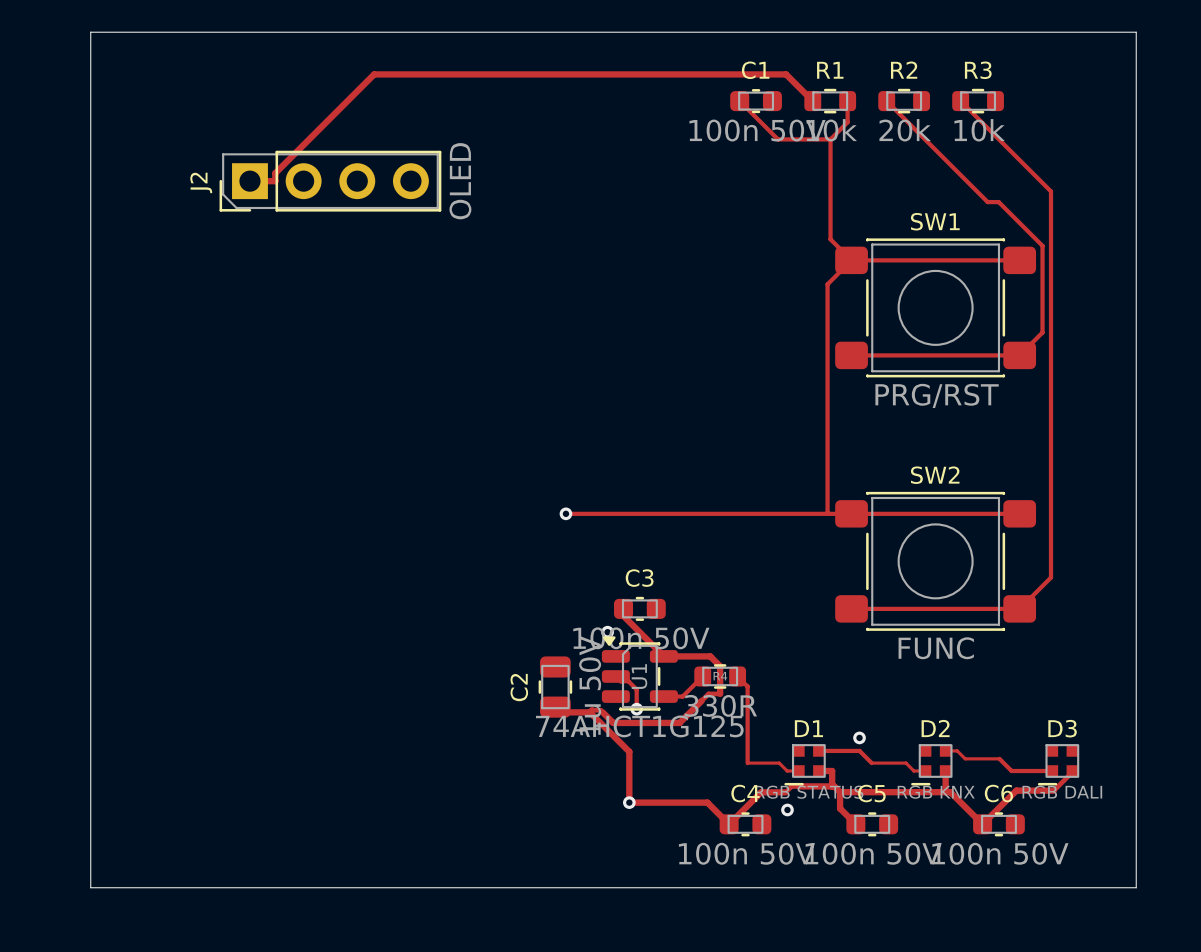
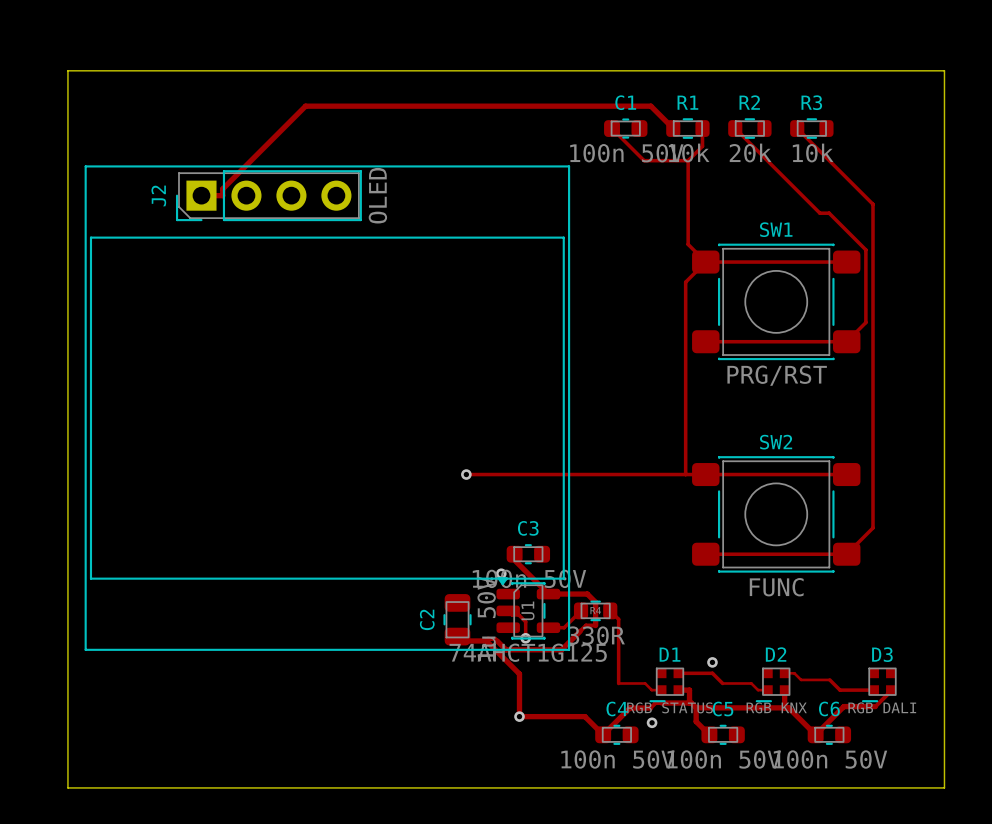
line: none -> (85, 166) (85, 649) (569, 649) (569, 166) (85, 166)
line: none -> (90, 237) (90, 578) (563, 578) (563, 237) (90, 237)

